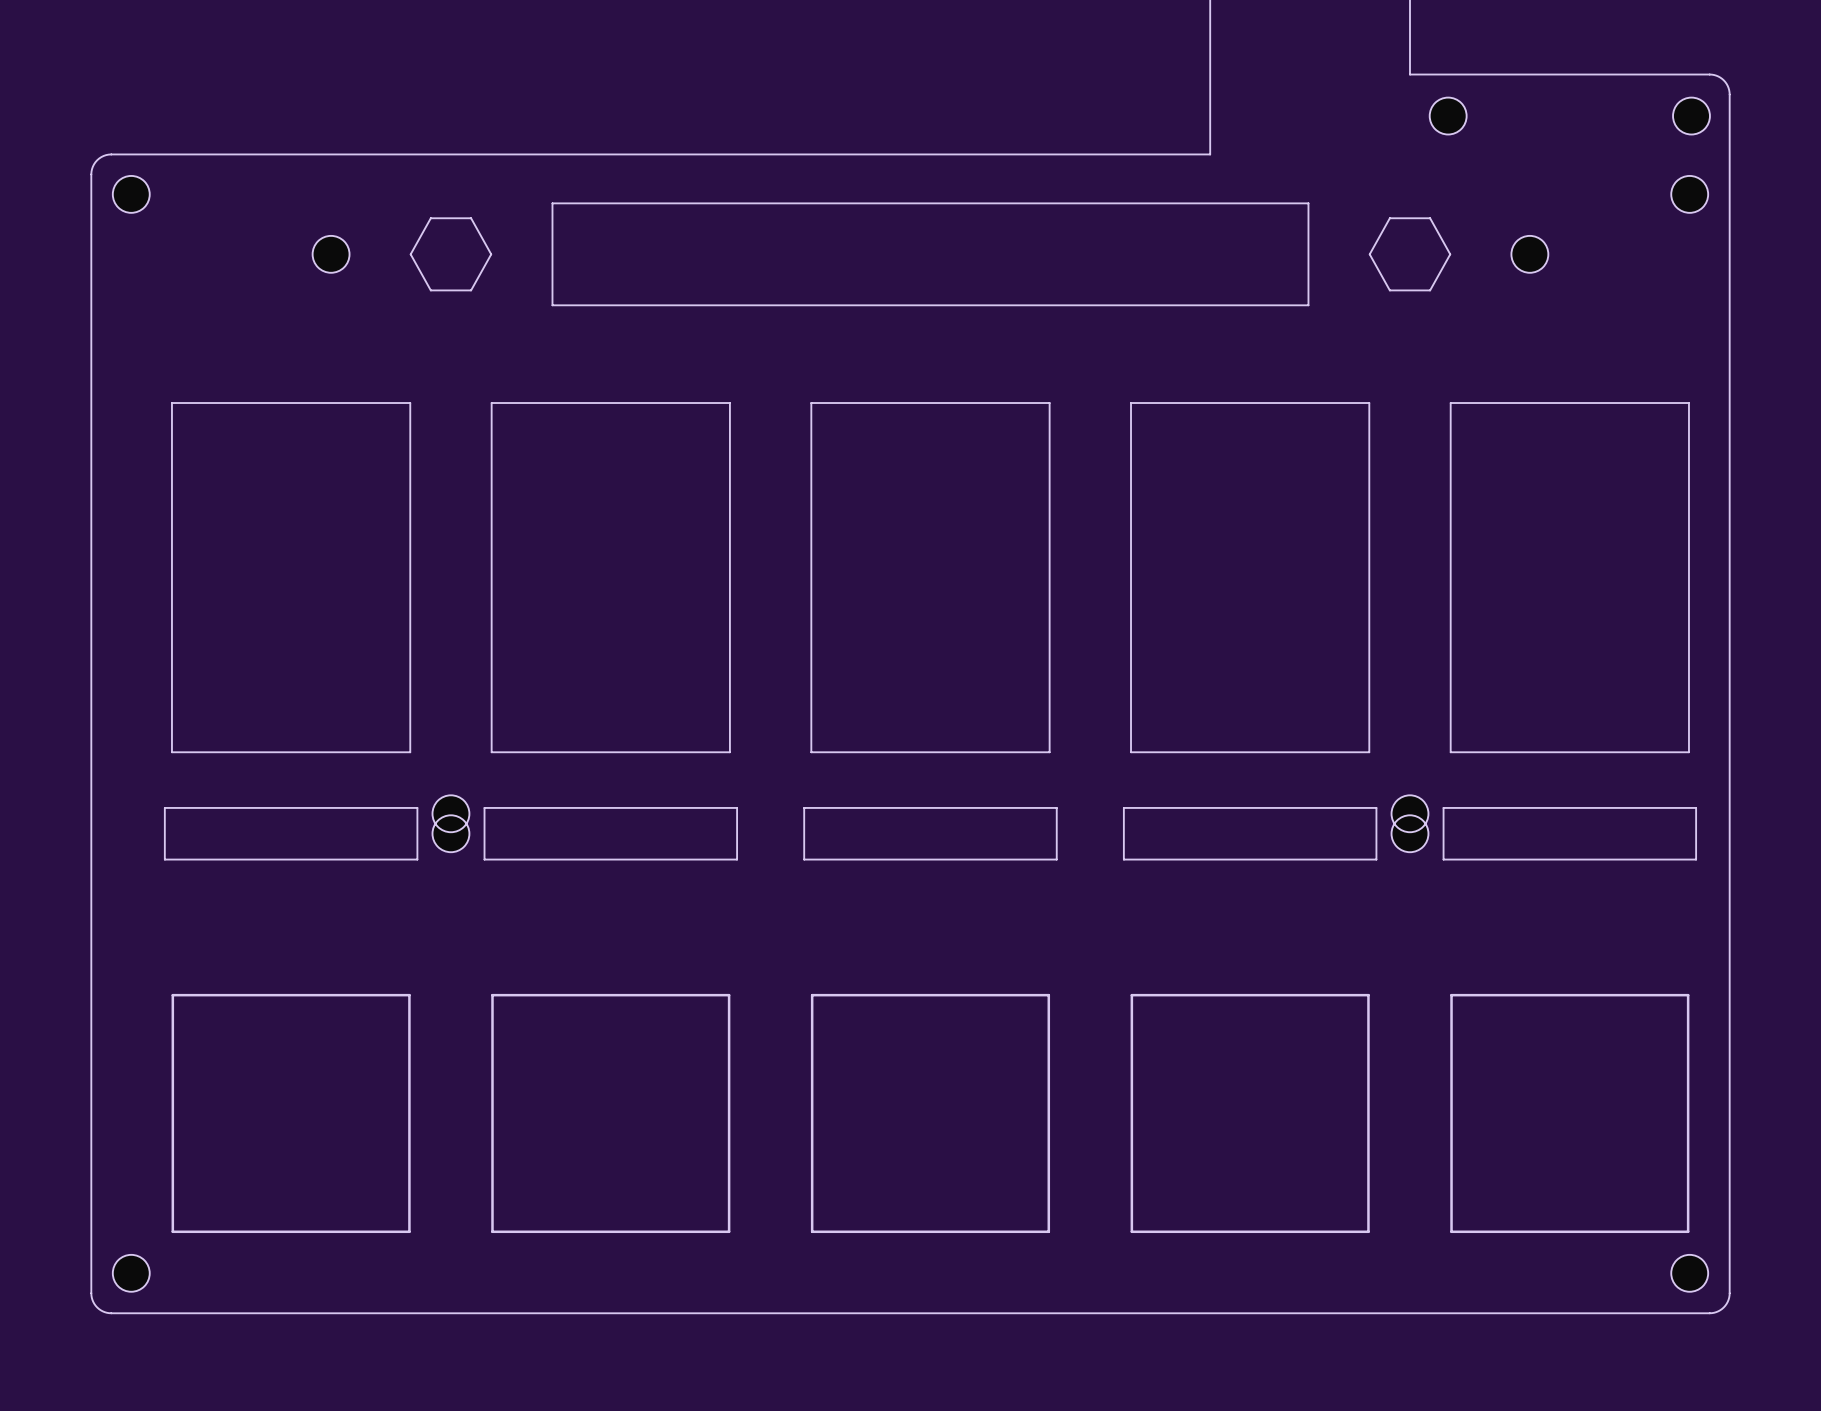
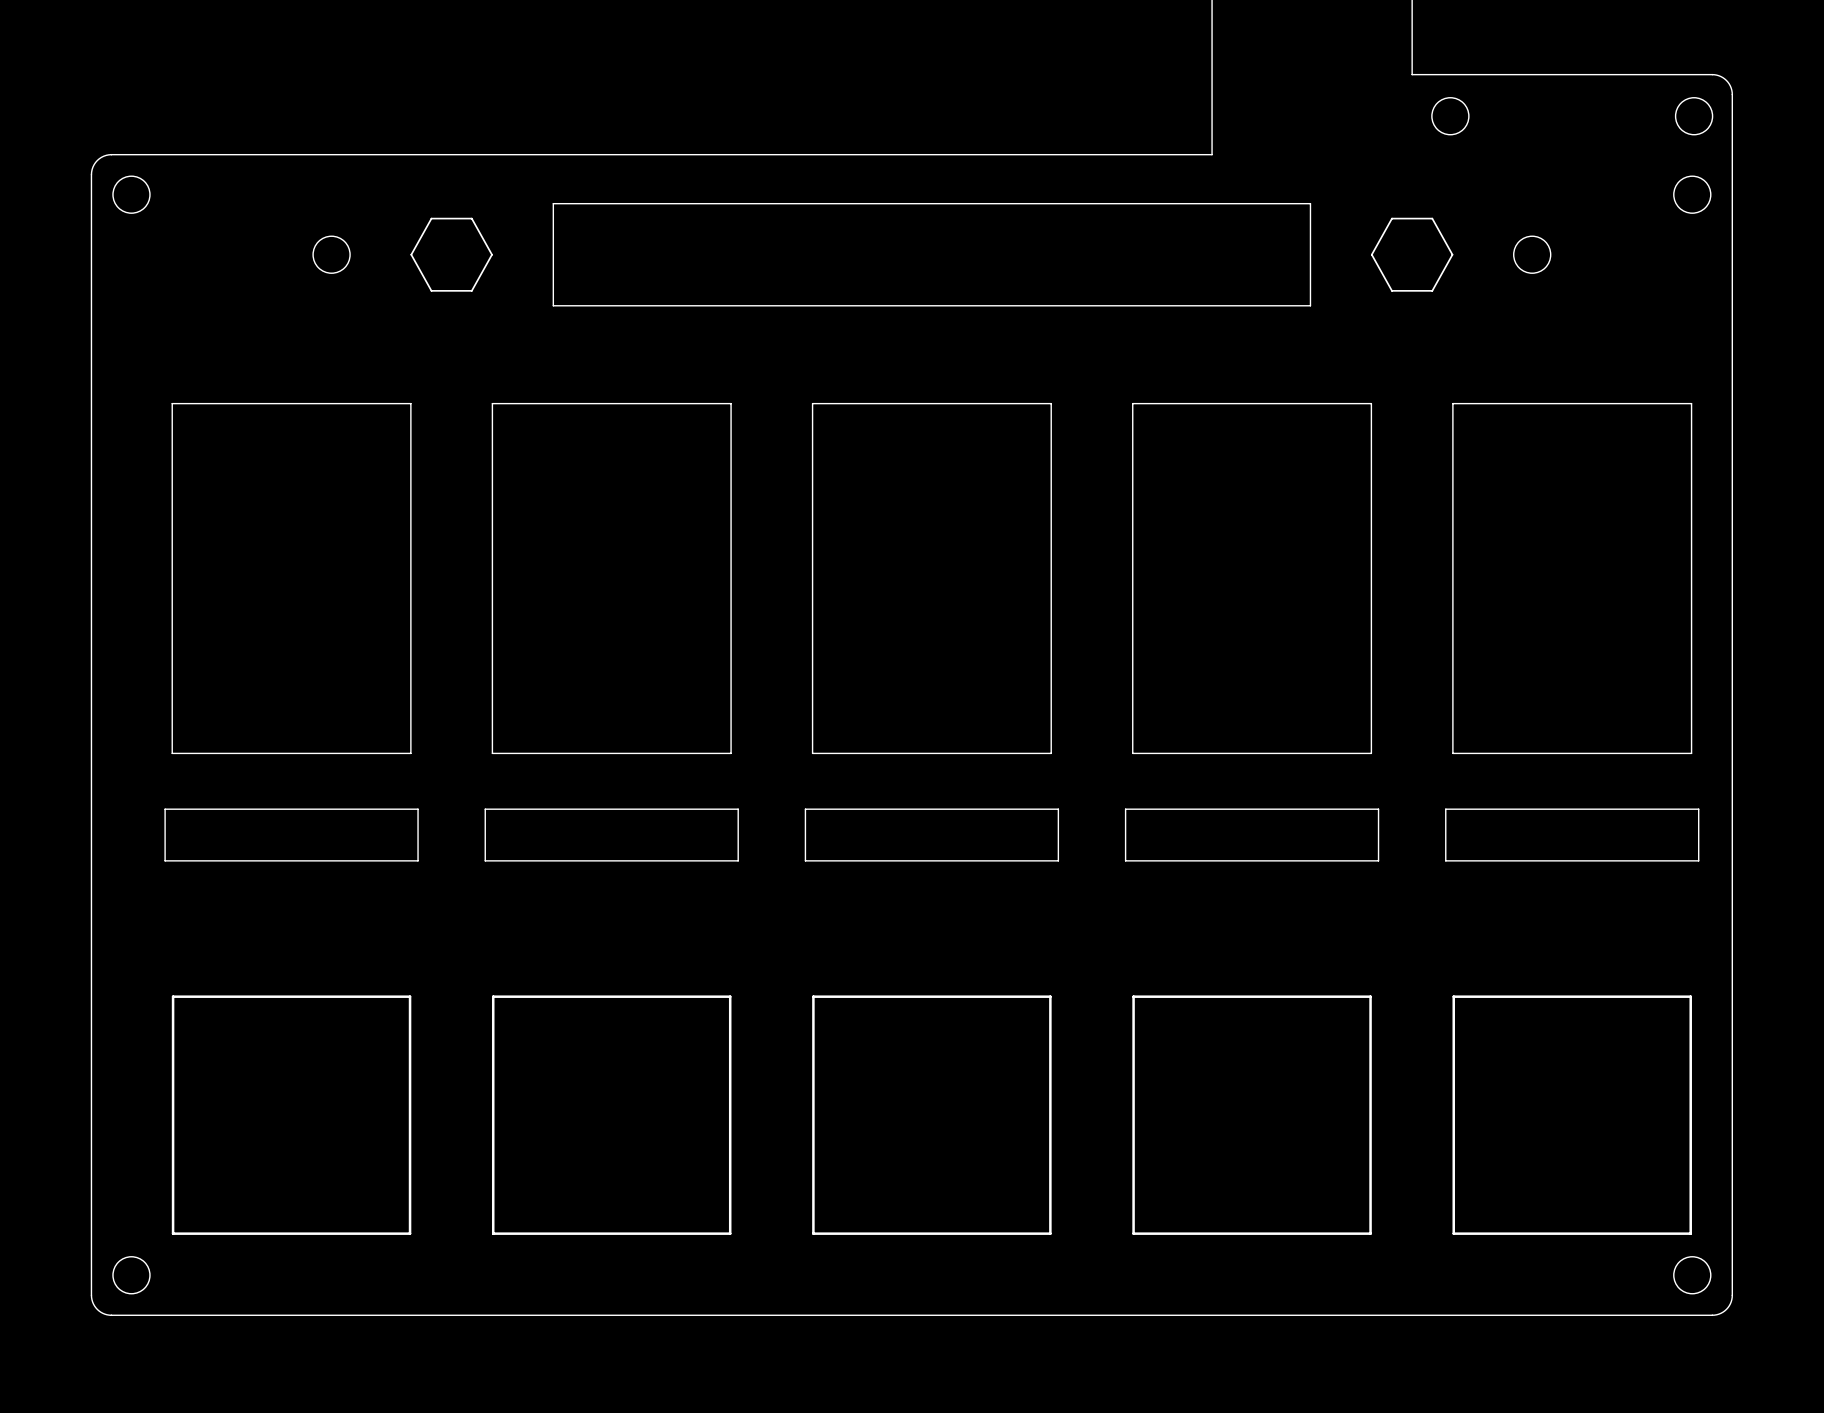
part: (450, 813) -> none
part: (1409, 813) -> none
part: (450, 833) -> none
part: (1409, 833) -> none

